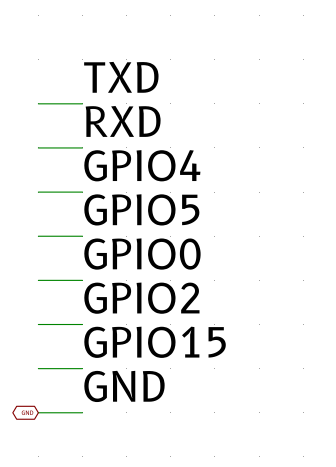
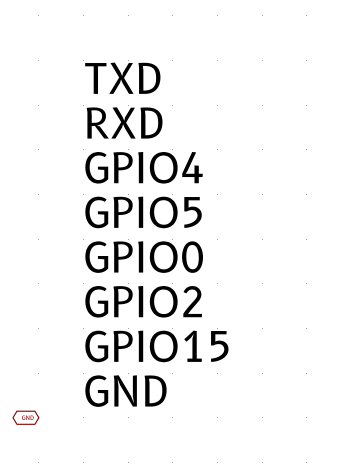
wire: (38, 103) (82, 103) -> none
wire: (38, 147) (82, 147) -> none
wire: (38, 192) (82, 192) -> none
wire: (38, 236) (82, 236) -> none
wire: (38, 280) (82, 280) -> none
wire: (38, 324) (82, 324) -> none
wire: (38, 368) (82, 368) -> none
wire: (38, 412) (82, 412) -> none

